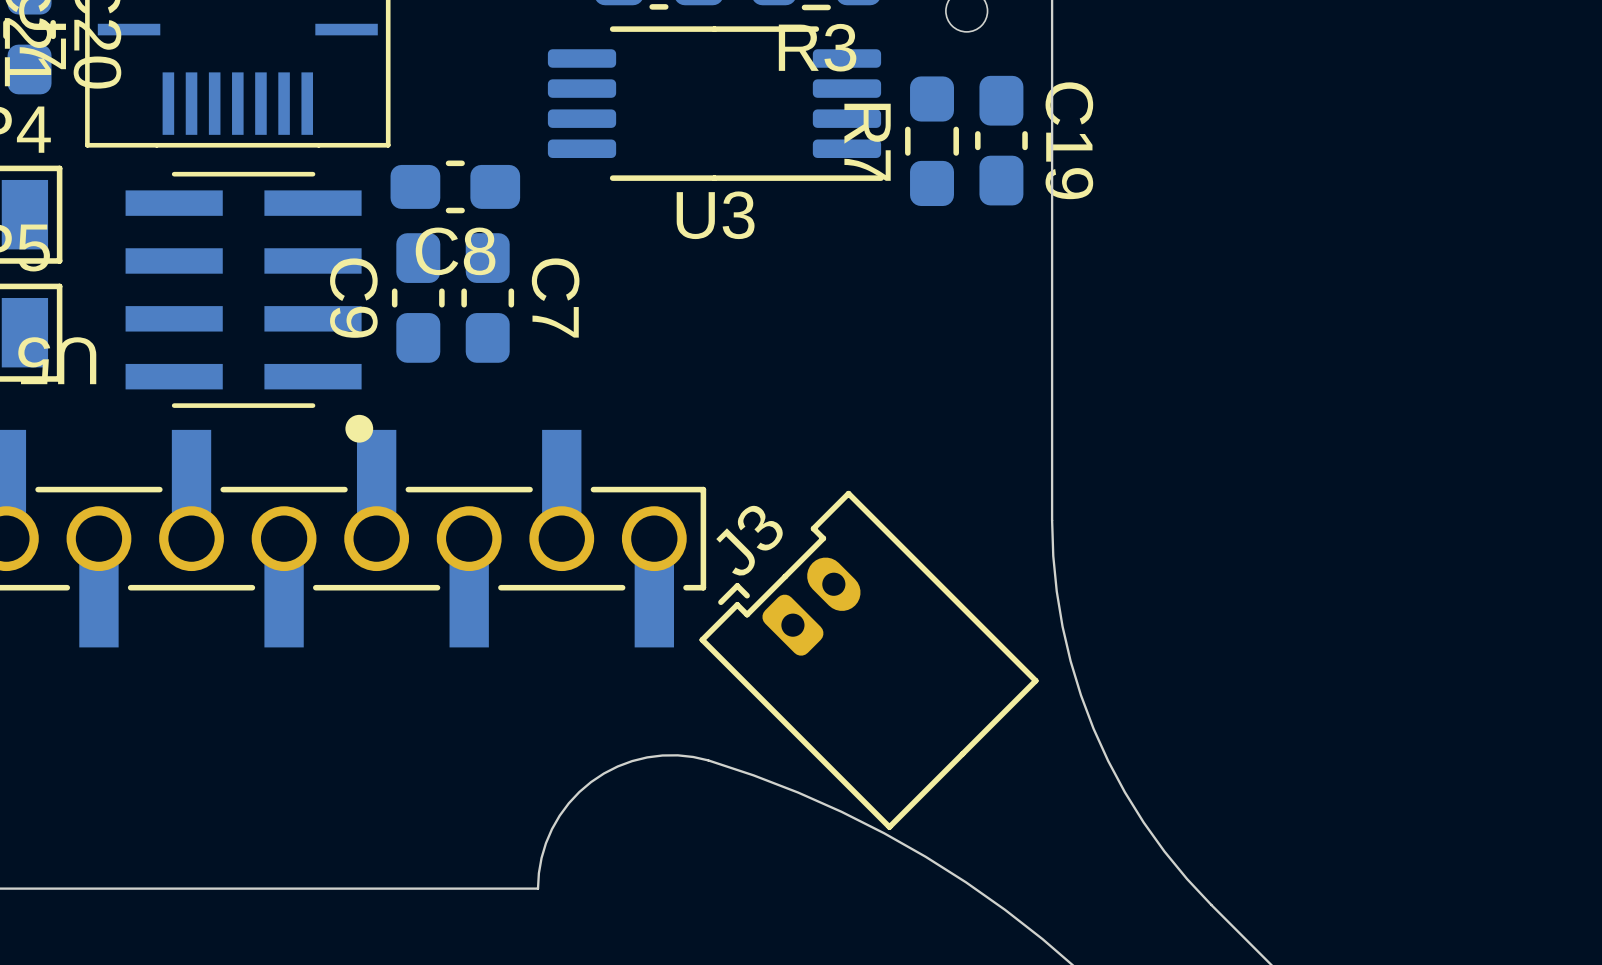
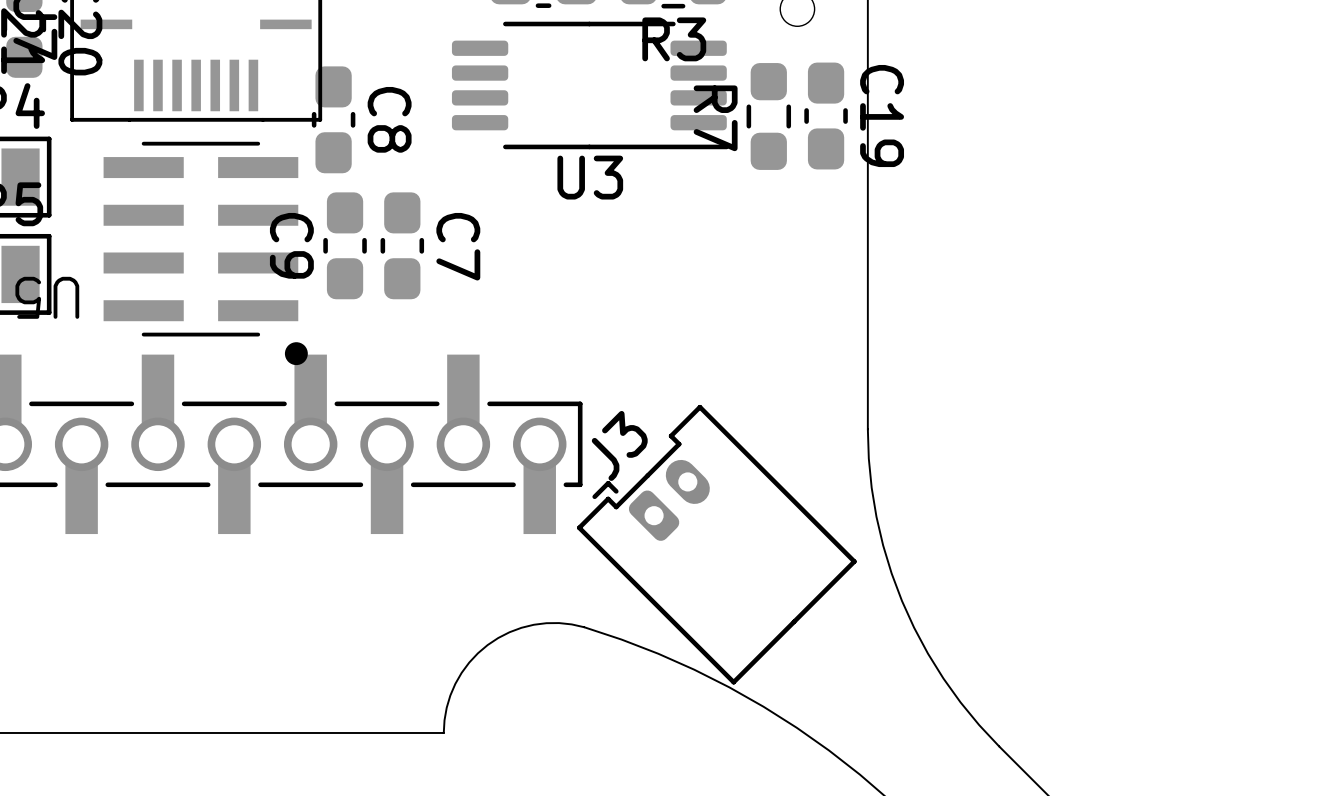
C8 rotation: 0° (455, 186) -> 90° clockwise (333, 119)
C8 name position: C8 (455, 251) -> C8 (389, 119)

